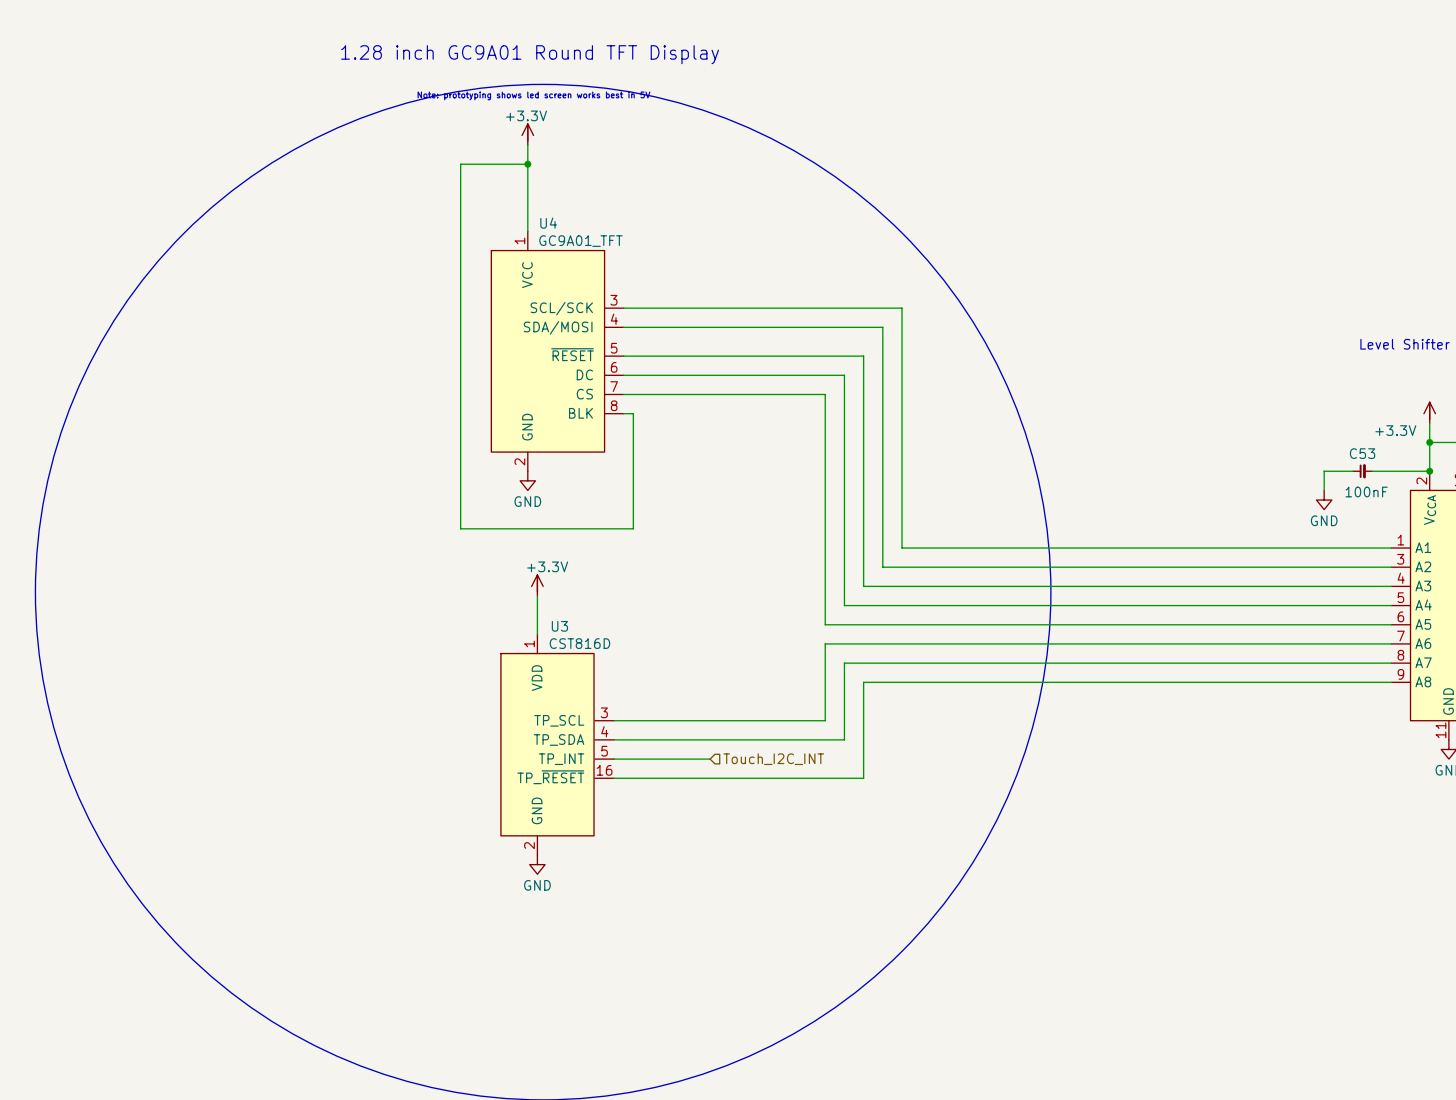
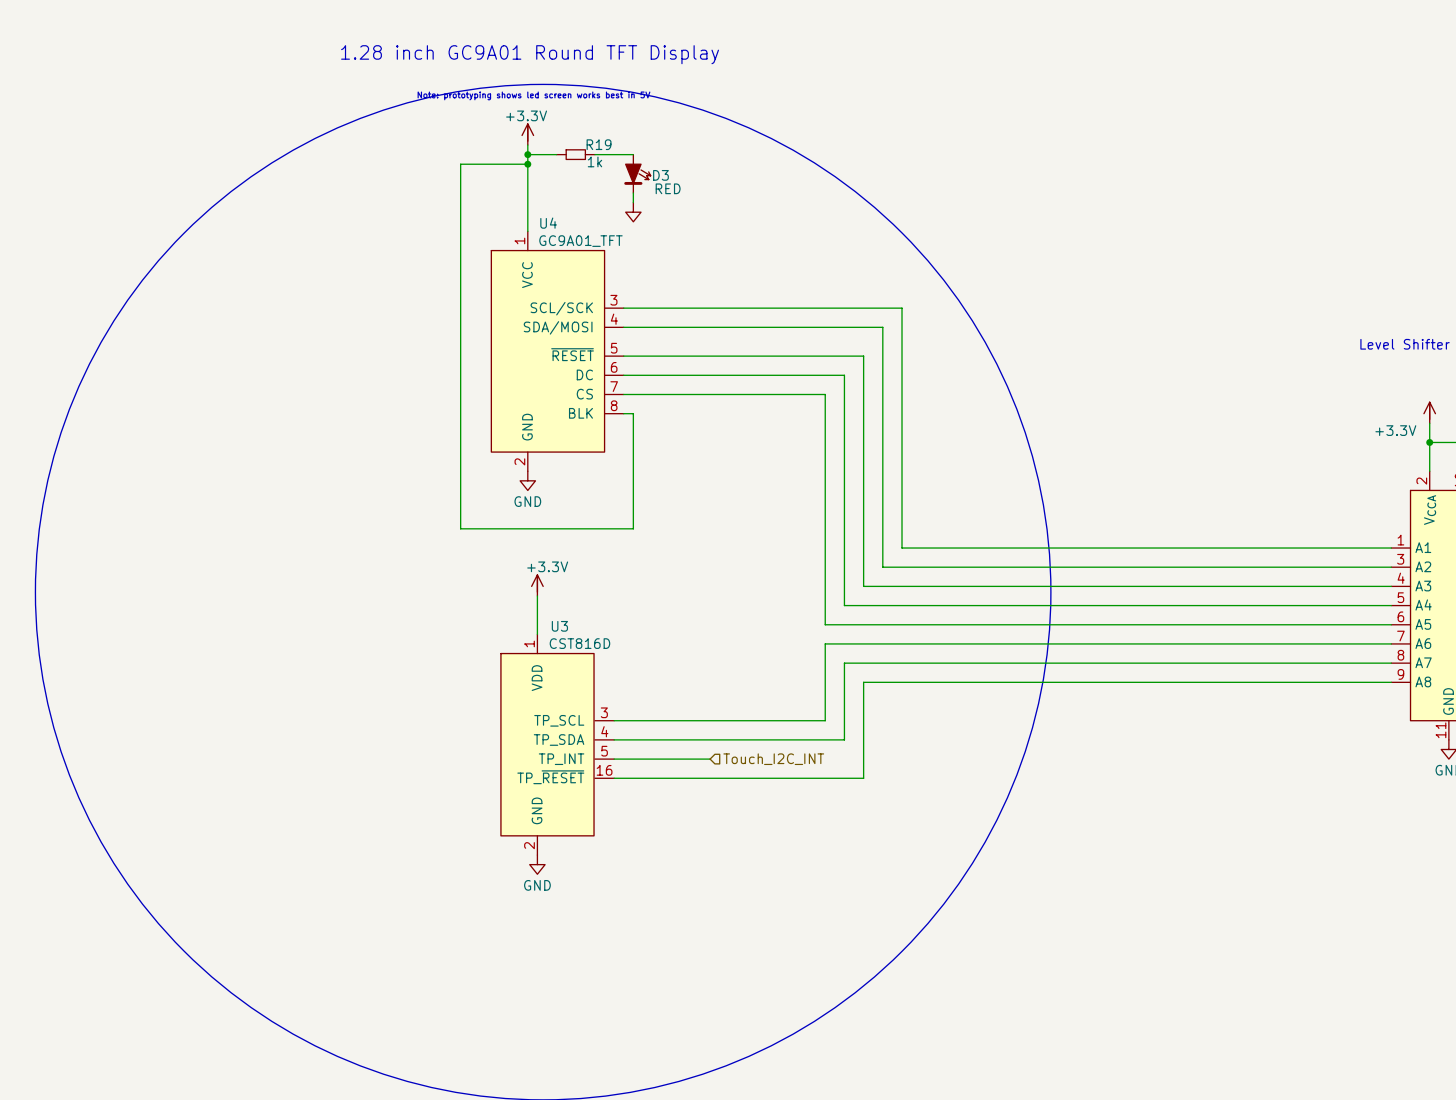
wire: none -> (527, 154) (556, 154)
junction: none -> (527, 154)
R19: none -> 1k (575, 154)
wire: none -> (594, 154) (633, 154)
D3: none -> RED (637, 173)
wire: none -> (633, 193) (633, 202)
power symbol: none -> (633, 212)
wire: (1352, 471) (1324, 471) (1324, 490) -> none
C53: 100nF (1362, 471) -> none
wire: (1372, 471) (1429, 471) -> none
junction: (1429, 471) -> none
power symbol: GND (1324, 500) -> none

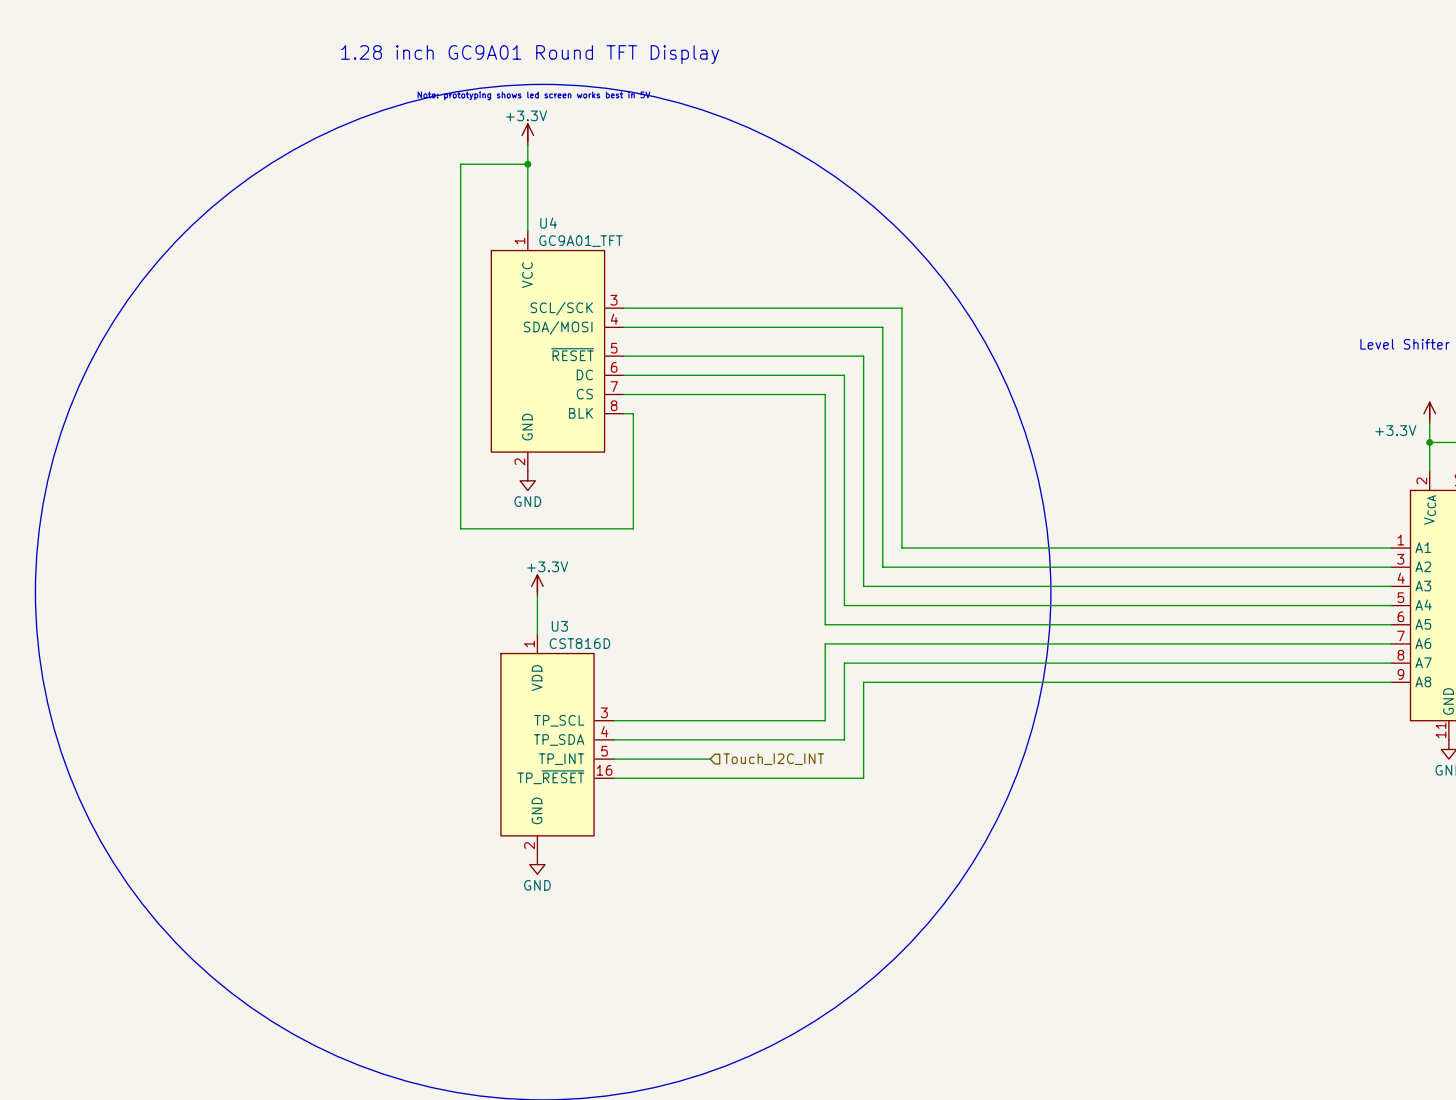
wire: (527, 154) (556, 154) -> none
junction: (527, 154) -> none
R19: 1k (575, 154) -> none
wire: (594, 154) (633, 154) -> none
D3: RED (637, 173) -> none
wire: (633, 193) (633, 202) -> none
power symbol: (633, 212) -> none

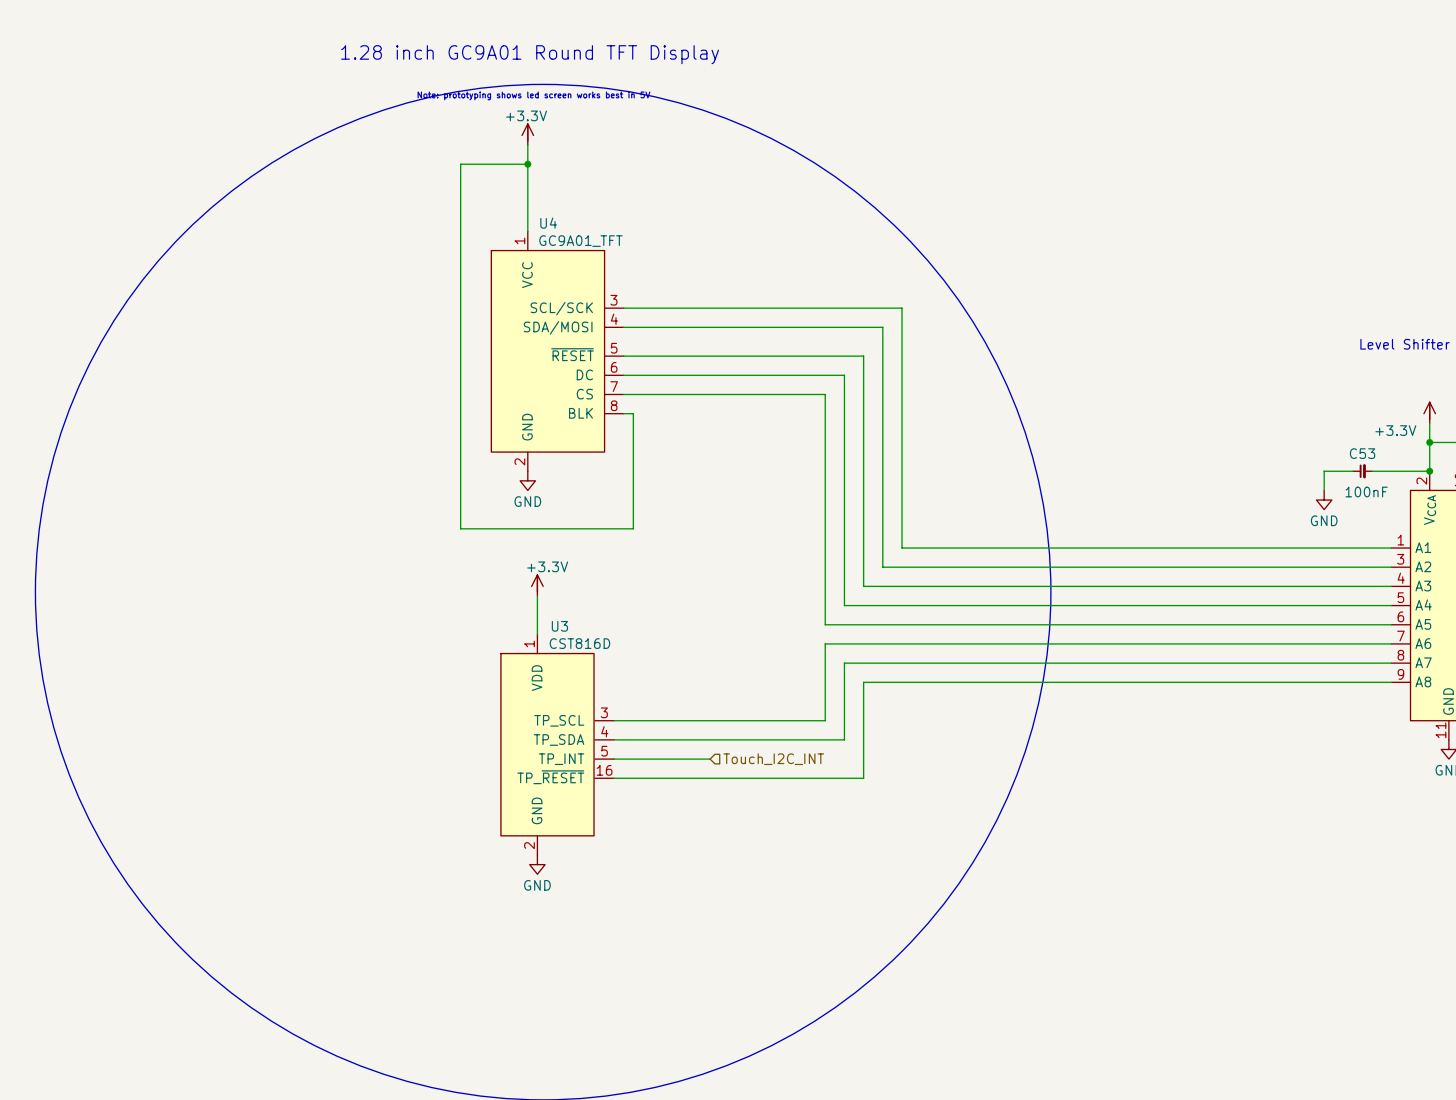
wire: none -> (1352, 471) (1324, 471) (1324, 490)
C53: none -> 100nF (1362, 471)
wire: none -> (1372, 471) (1429, 471)
junction: none -> (1429, 471)
power symbol: none -> GND (1324, 500)

